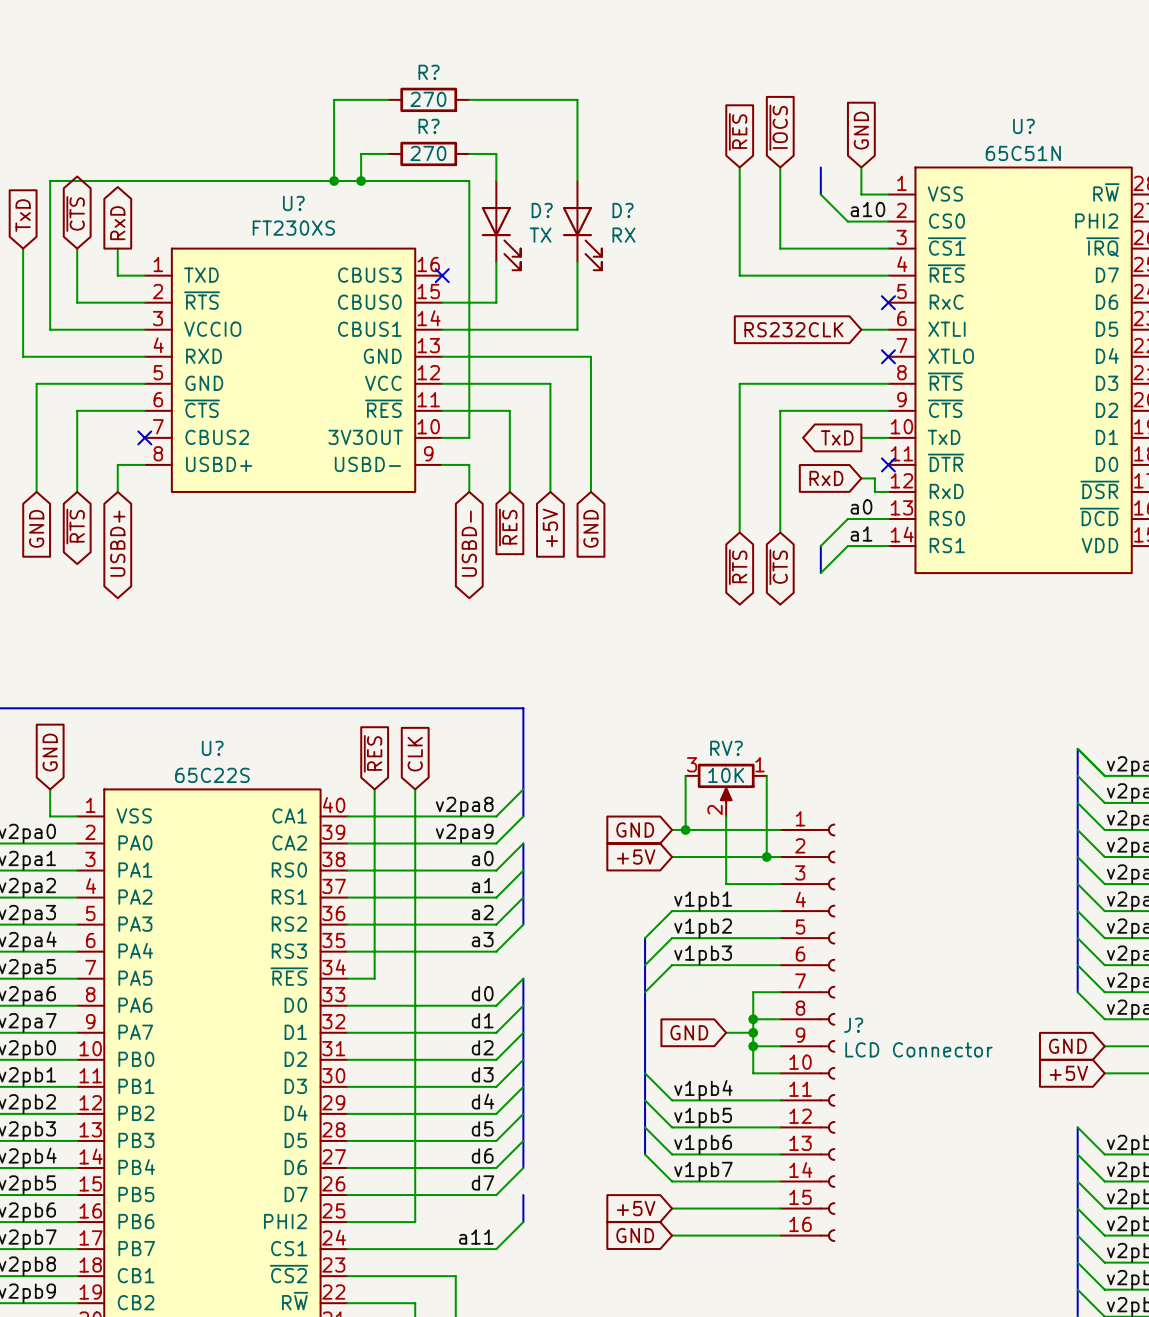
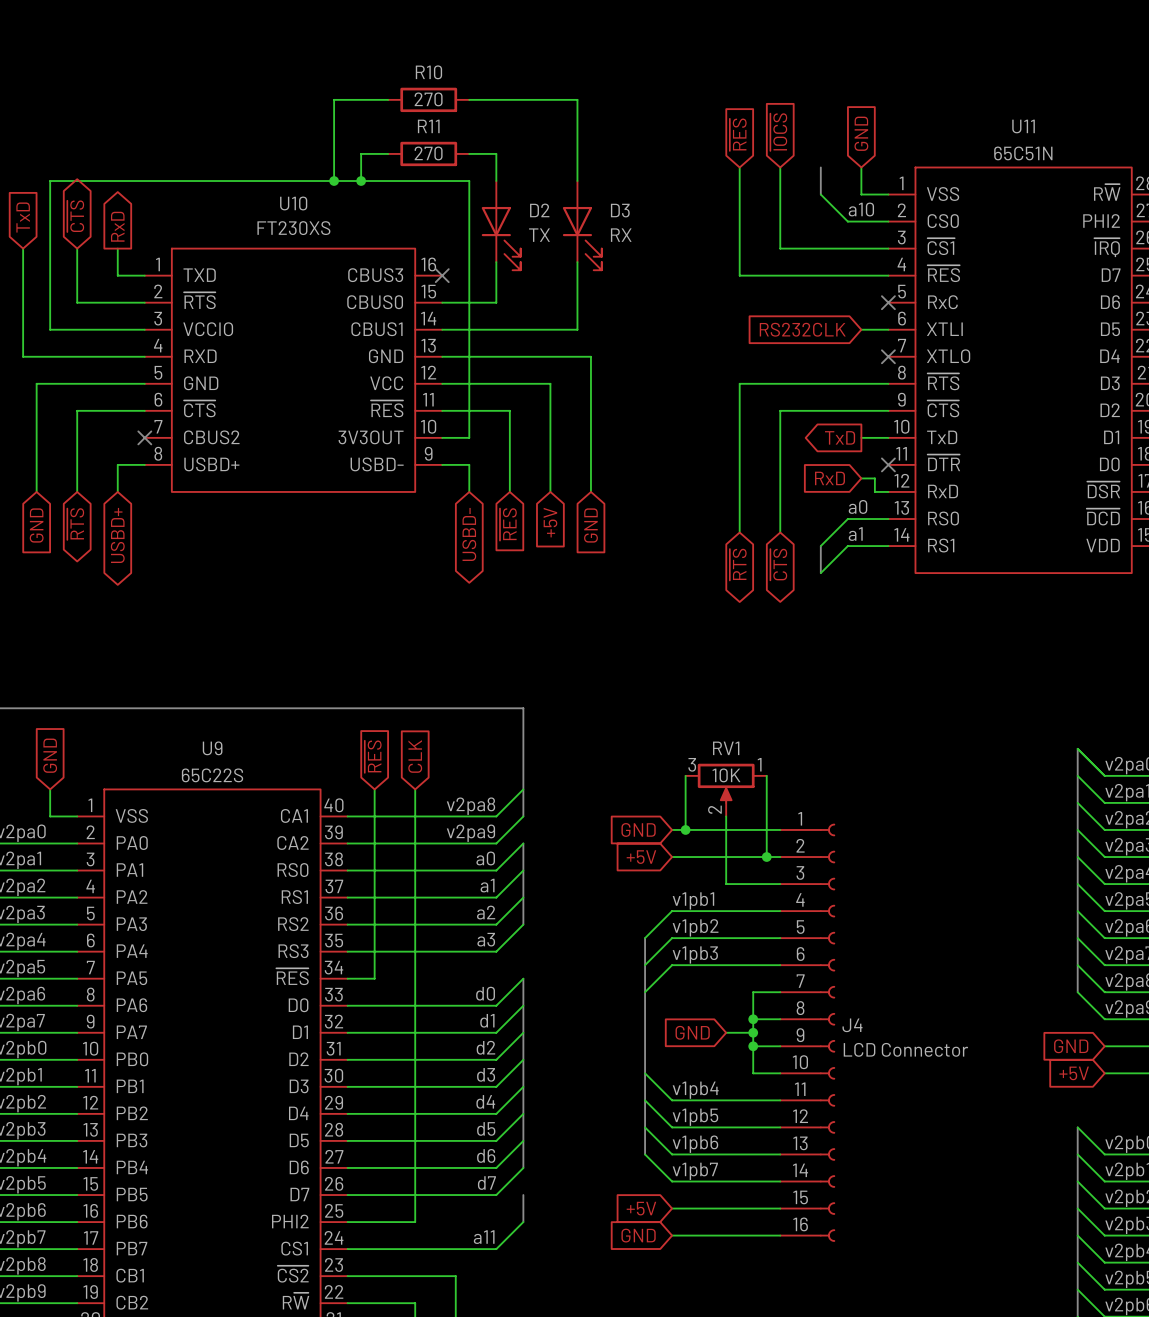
R? name: R? (429, 72) -> R10 (428, 72)
R? name: R? (429, 126) -> R11 (428, 126)
U? name: U? (1023, 126) -> U11 (1023, 126)
U? name: U? (293, 203) -> U10 (293, 203)
D? name: D? (542, 210) -> D2 (539, 210)
D? name: D? (623, 210) -> D3 (620, 210)
U? name: U? (212, 748) -> U9 (212, 748)
RV? name: RV? (726, 748) -> RV1 (726, 748)
J? name: J? (853, 1025) -> J4 (852, 1025)

